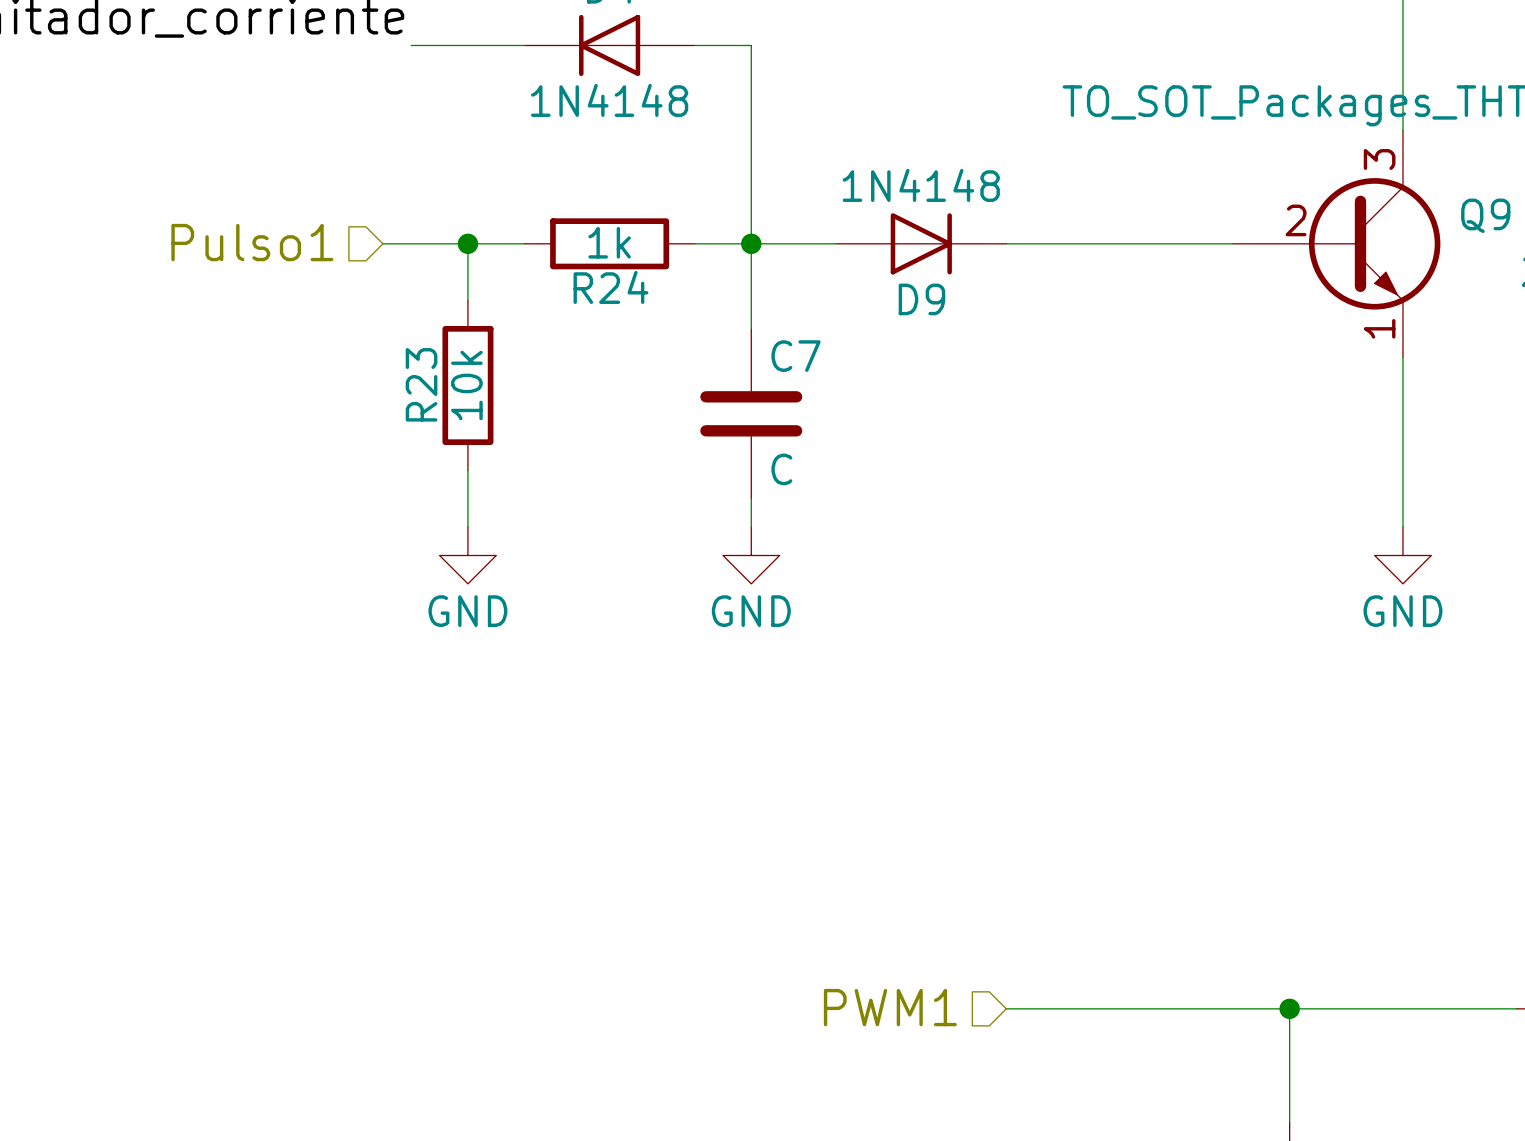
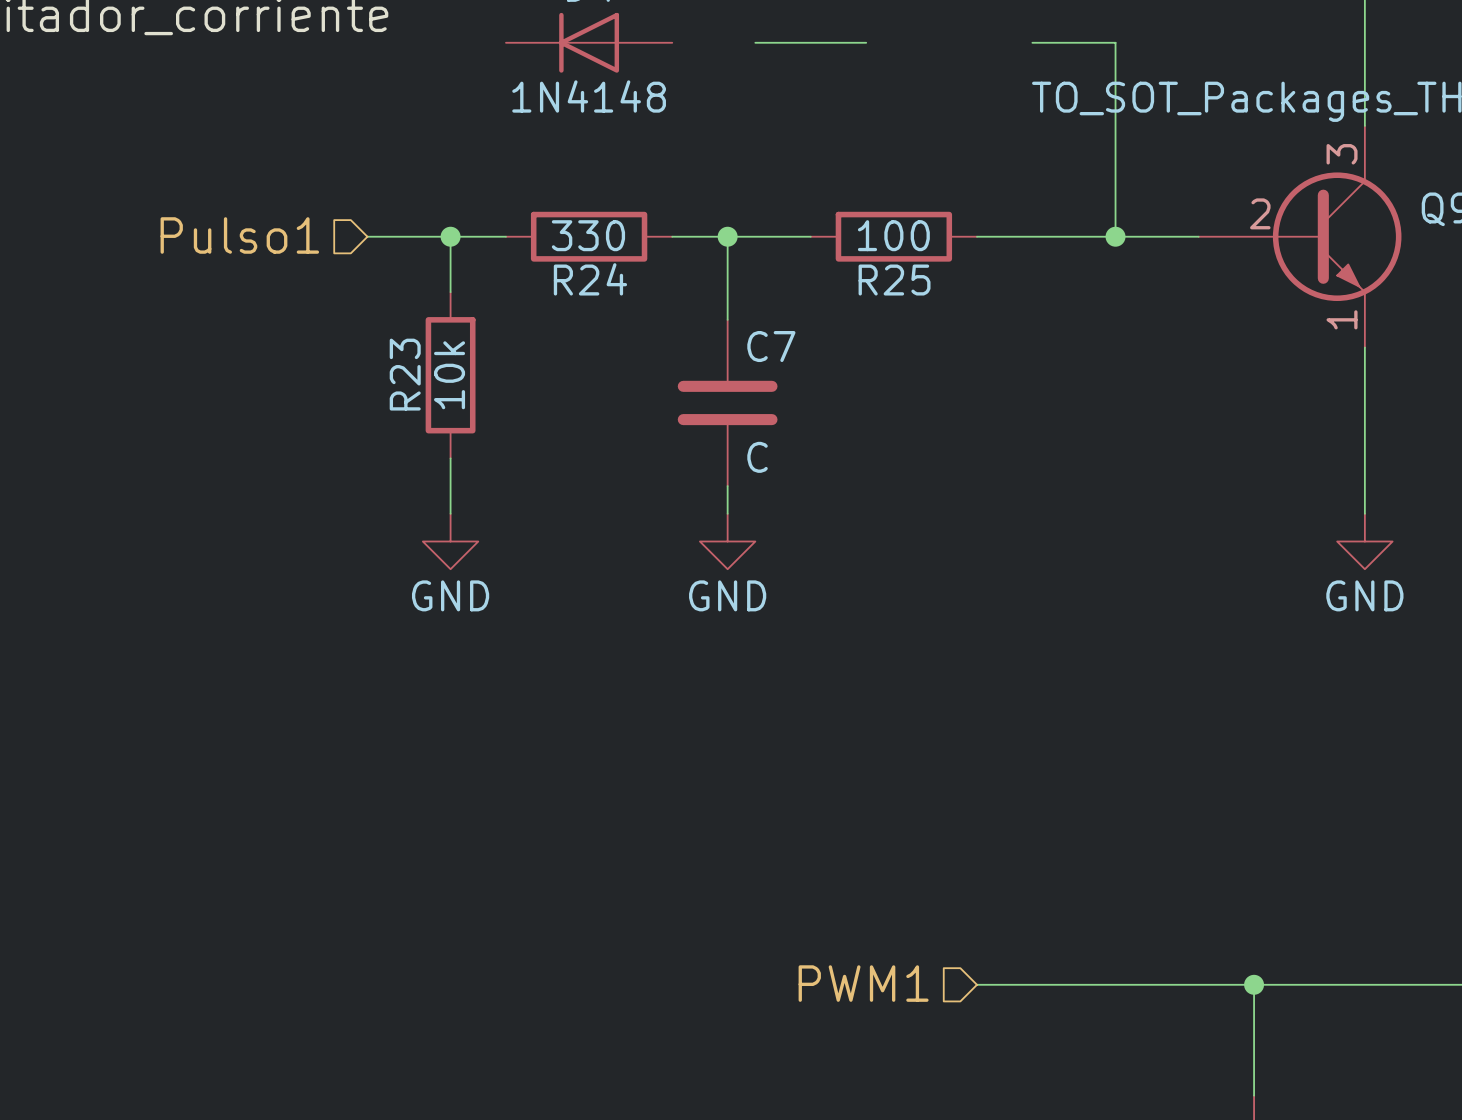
wire: (411, 45) (524, 45) -> (755, 42) (866, 42)
wire: (694, 45) (751, 45) (751, 243) -> none
wire: none -> (1032, 42) (1115, 42) (1115, 236)
R24 value: 1k (609, 242) -> 330 (588, 235)
D9: 1N4148 (921, 243) -> none
R25: none -> 100 (893, 236)
junction: none -> (1115, 236)

